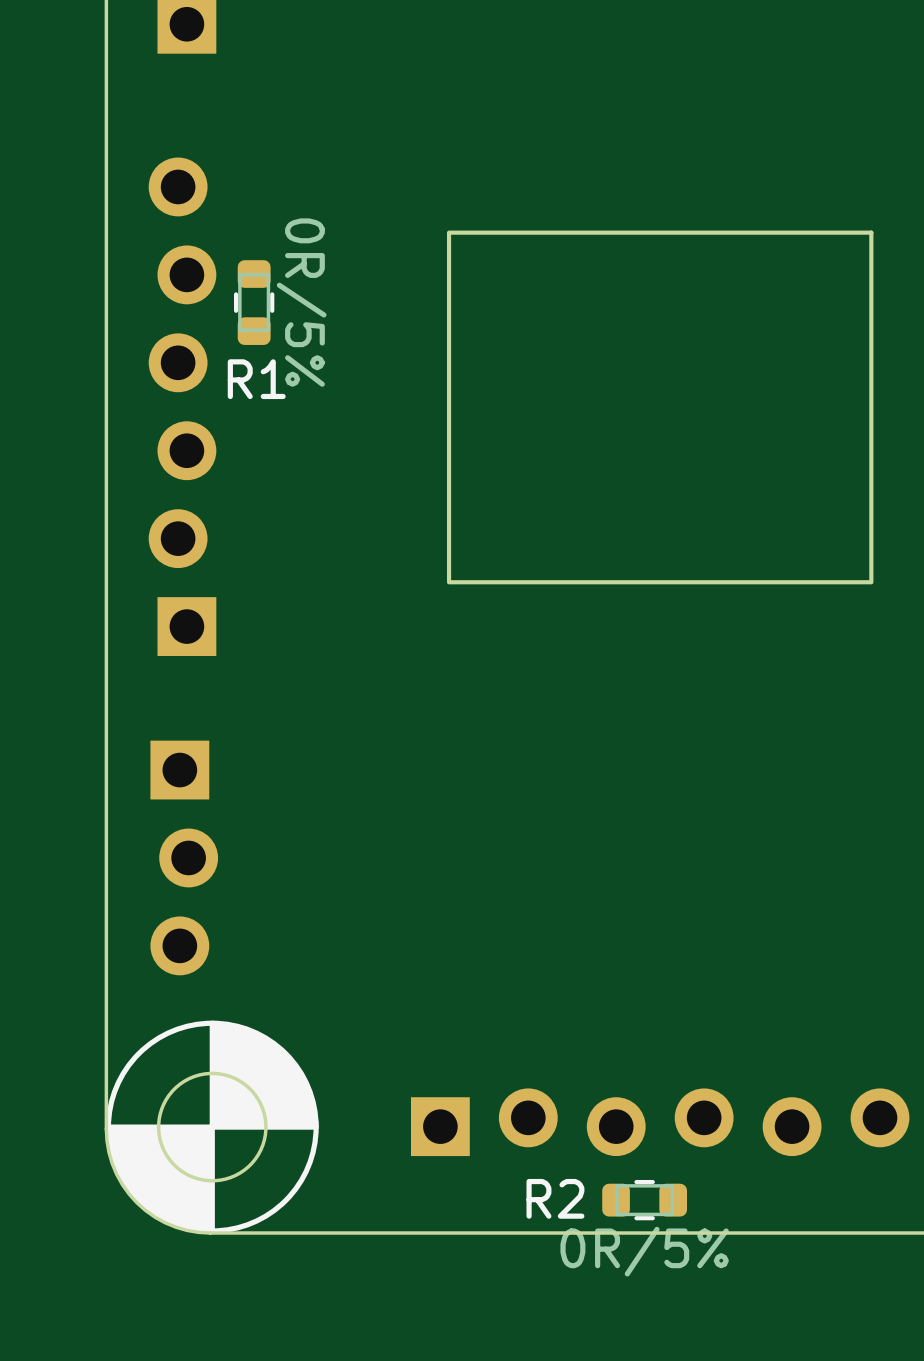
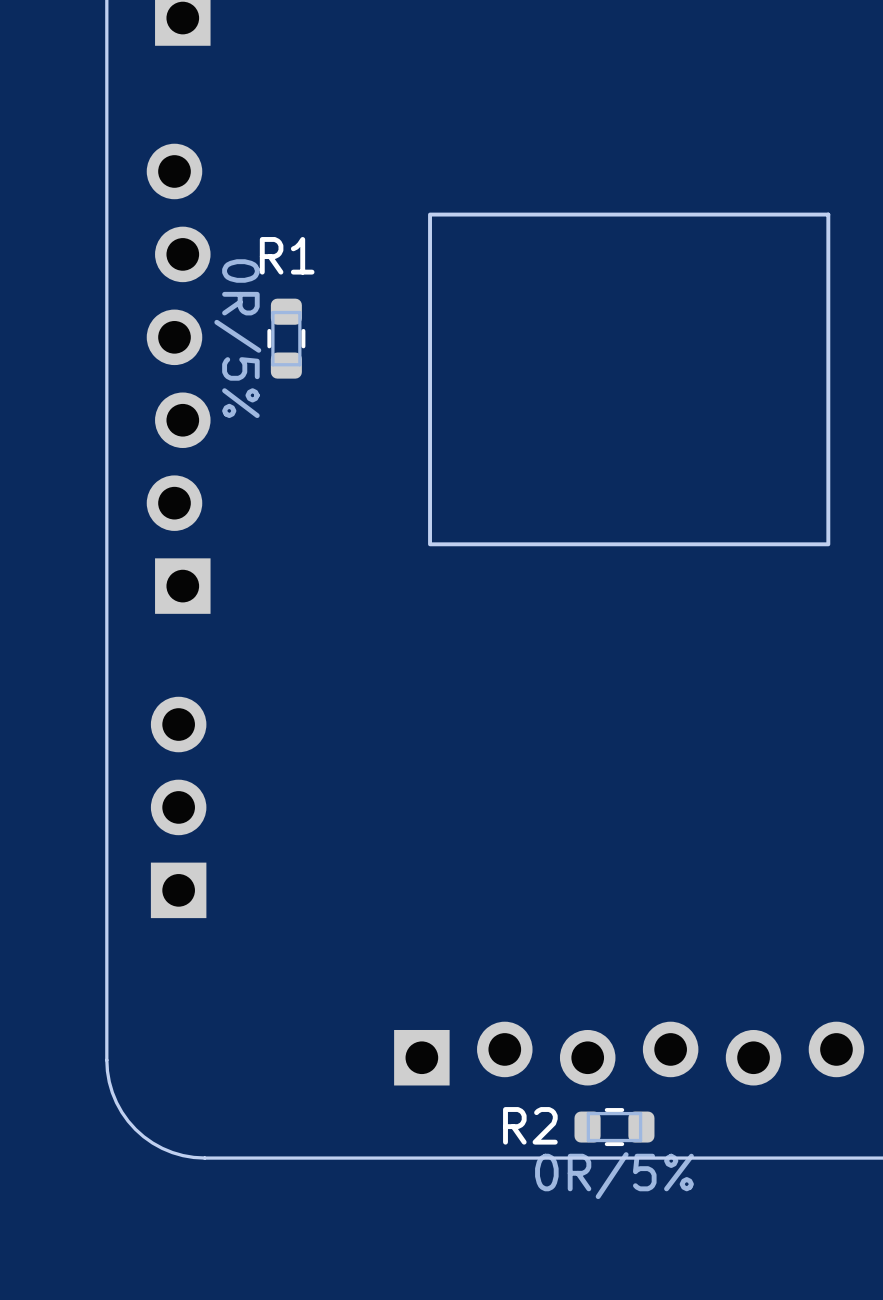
R1 position: (254, 302) -> (286, 338)
R1 value position: 0R/5% (301, 302) -> 0R/5% (237, 338)
R1 name position: R1 (256, 379) -> R1 (287, 255)
part footprint: [150, 740, 219, 976] -> [150, 696, 207, 919]
drawing: [105, 1020, 319, 1234] -> none
round board edge: [156, 1071, 268, 1183] -> none

